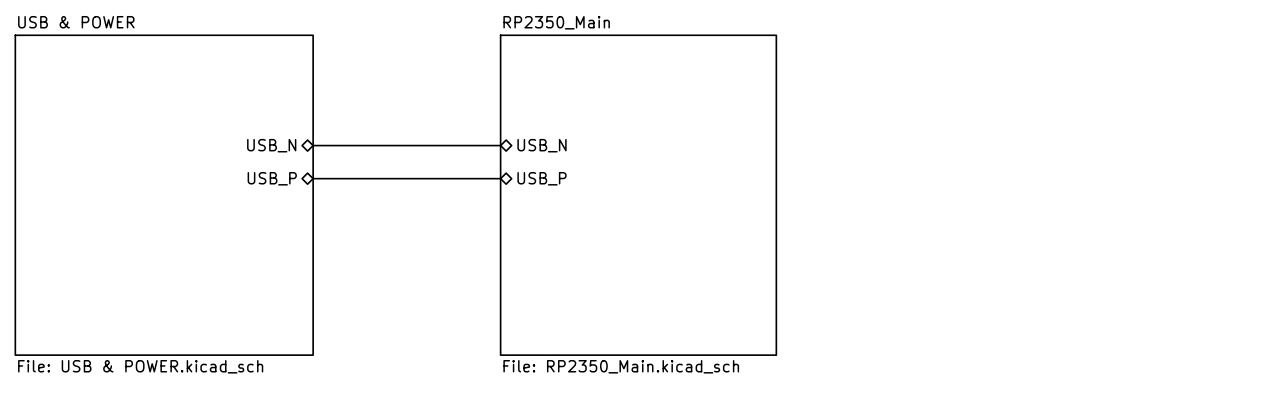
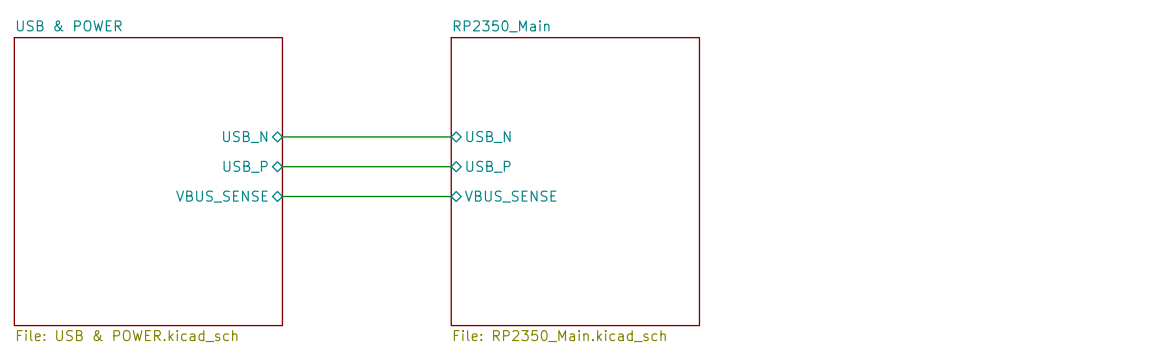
sheet pin: none -> VBUS_SENSE (222, 196)
wire: none -> (282, 196) (451, 196)
sheet pin: none -> VBUS_SENSE (510, 196)

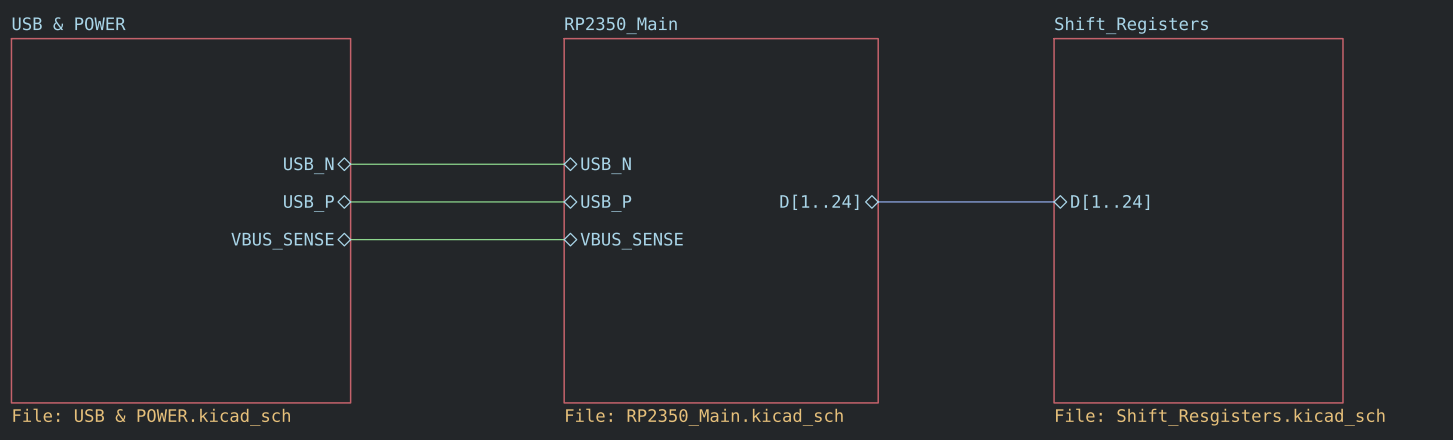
bus: none -> (878, 201) (1054, 201)
sheet pin: none -> D[1..24] (819, 202)
sheet pin: none -> D[1..24] (1110, 202)
sheet Shift_Registers: none -> File: Shift_Resgisters.kicad_sch (1198, 220)

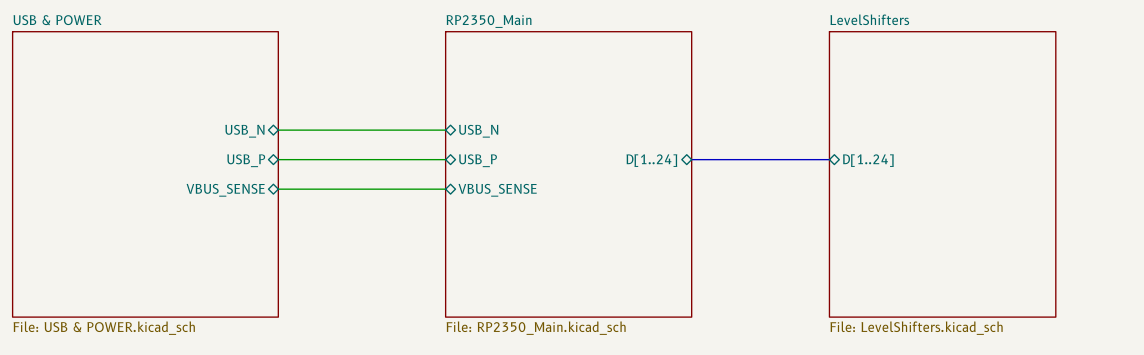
sheet Shift_Registers name: Shift_Registers (1131, 25) -> LevelShifters (869, 19)
sheet Shift_Registers value: File: Shift_Resgisters.kicad_sch (1220, 417) -> File: LevelShifters.kicad_sch (916, 328)

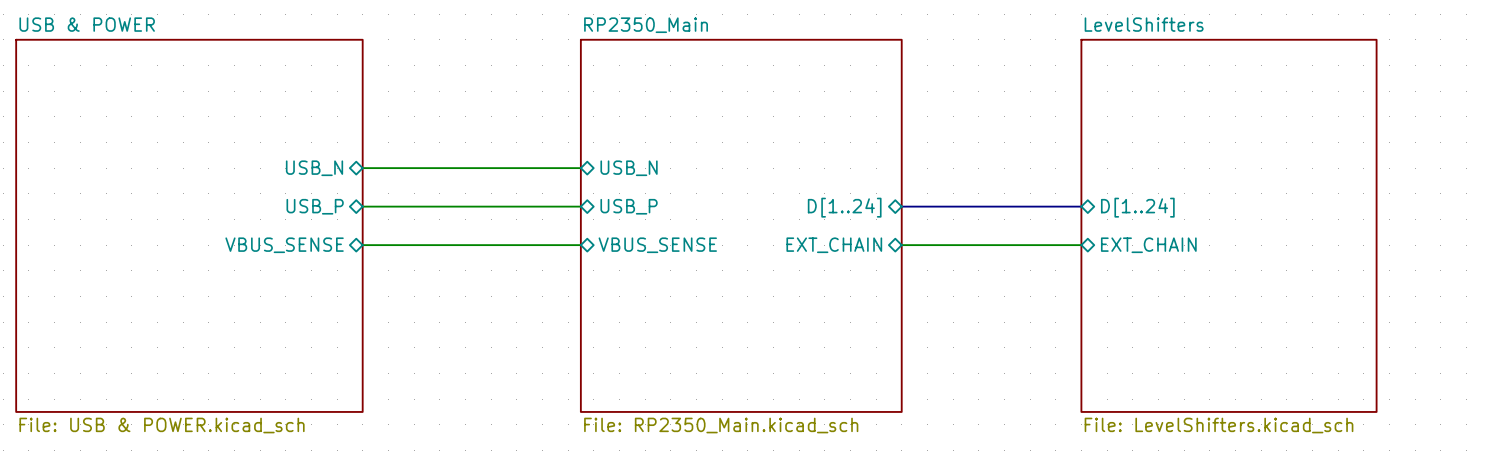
wire: none -> (901, 245) (1081, 245)
sheet pin: none -> EXT_CHAIN (834, 245)
sheet pin: none -> EXT_CHAIN (1148, 245)

